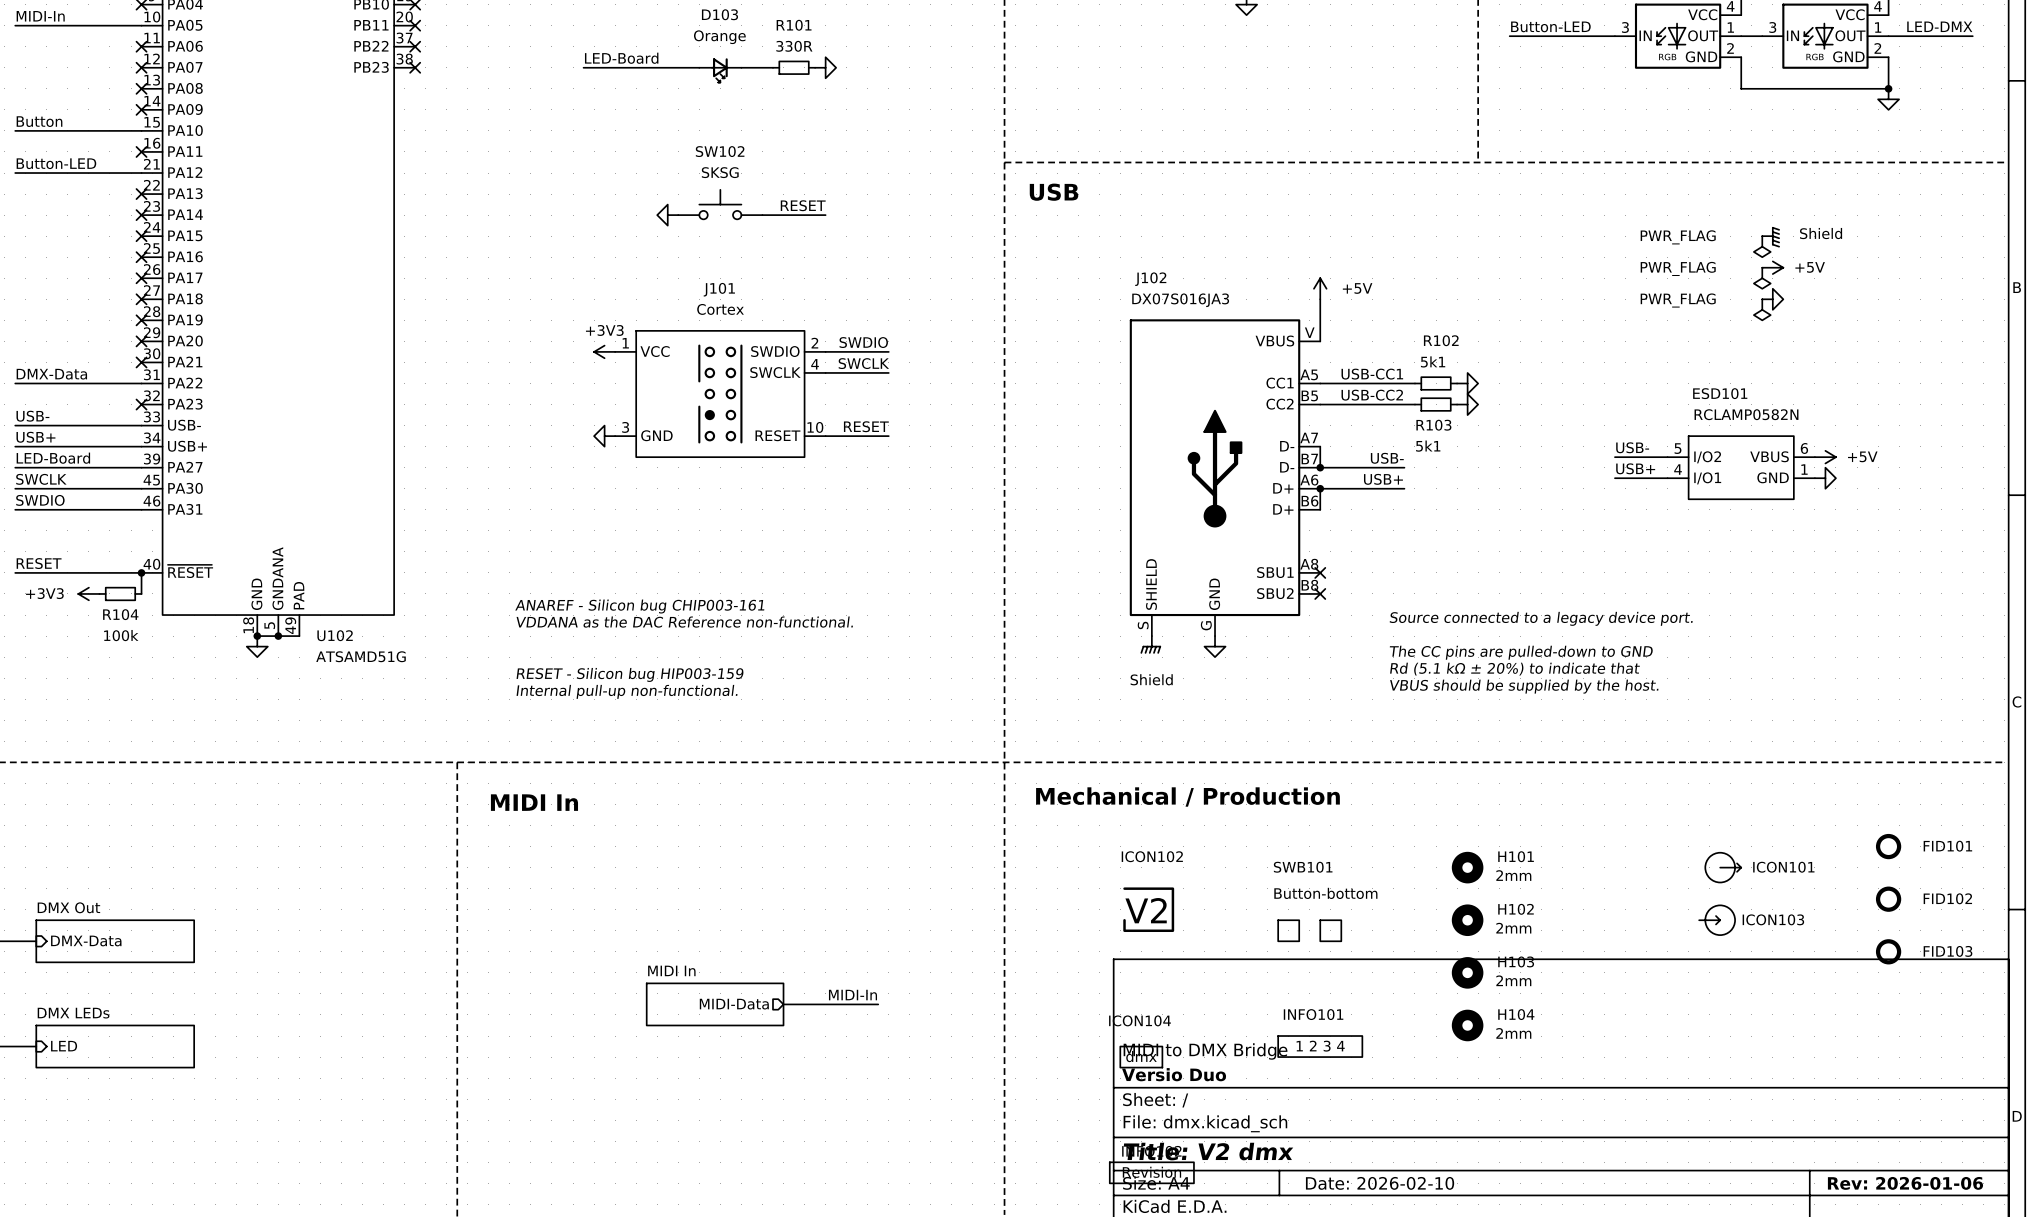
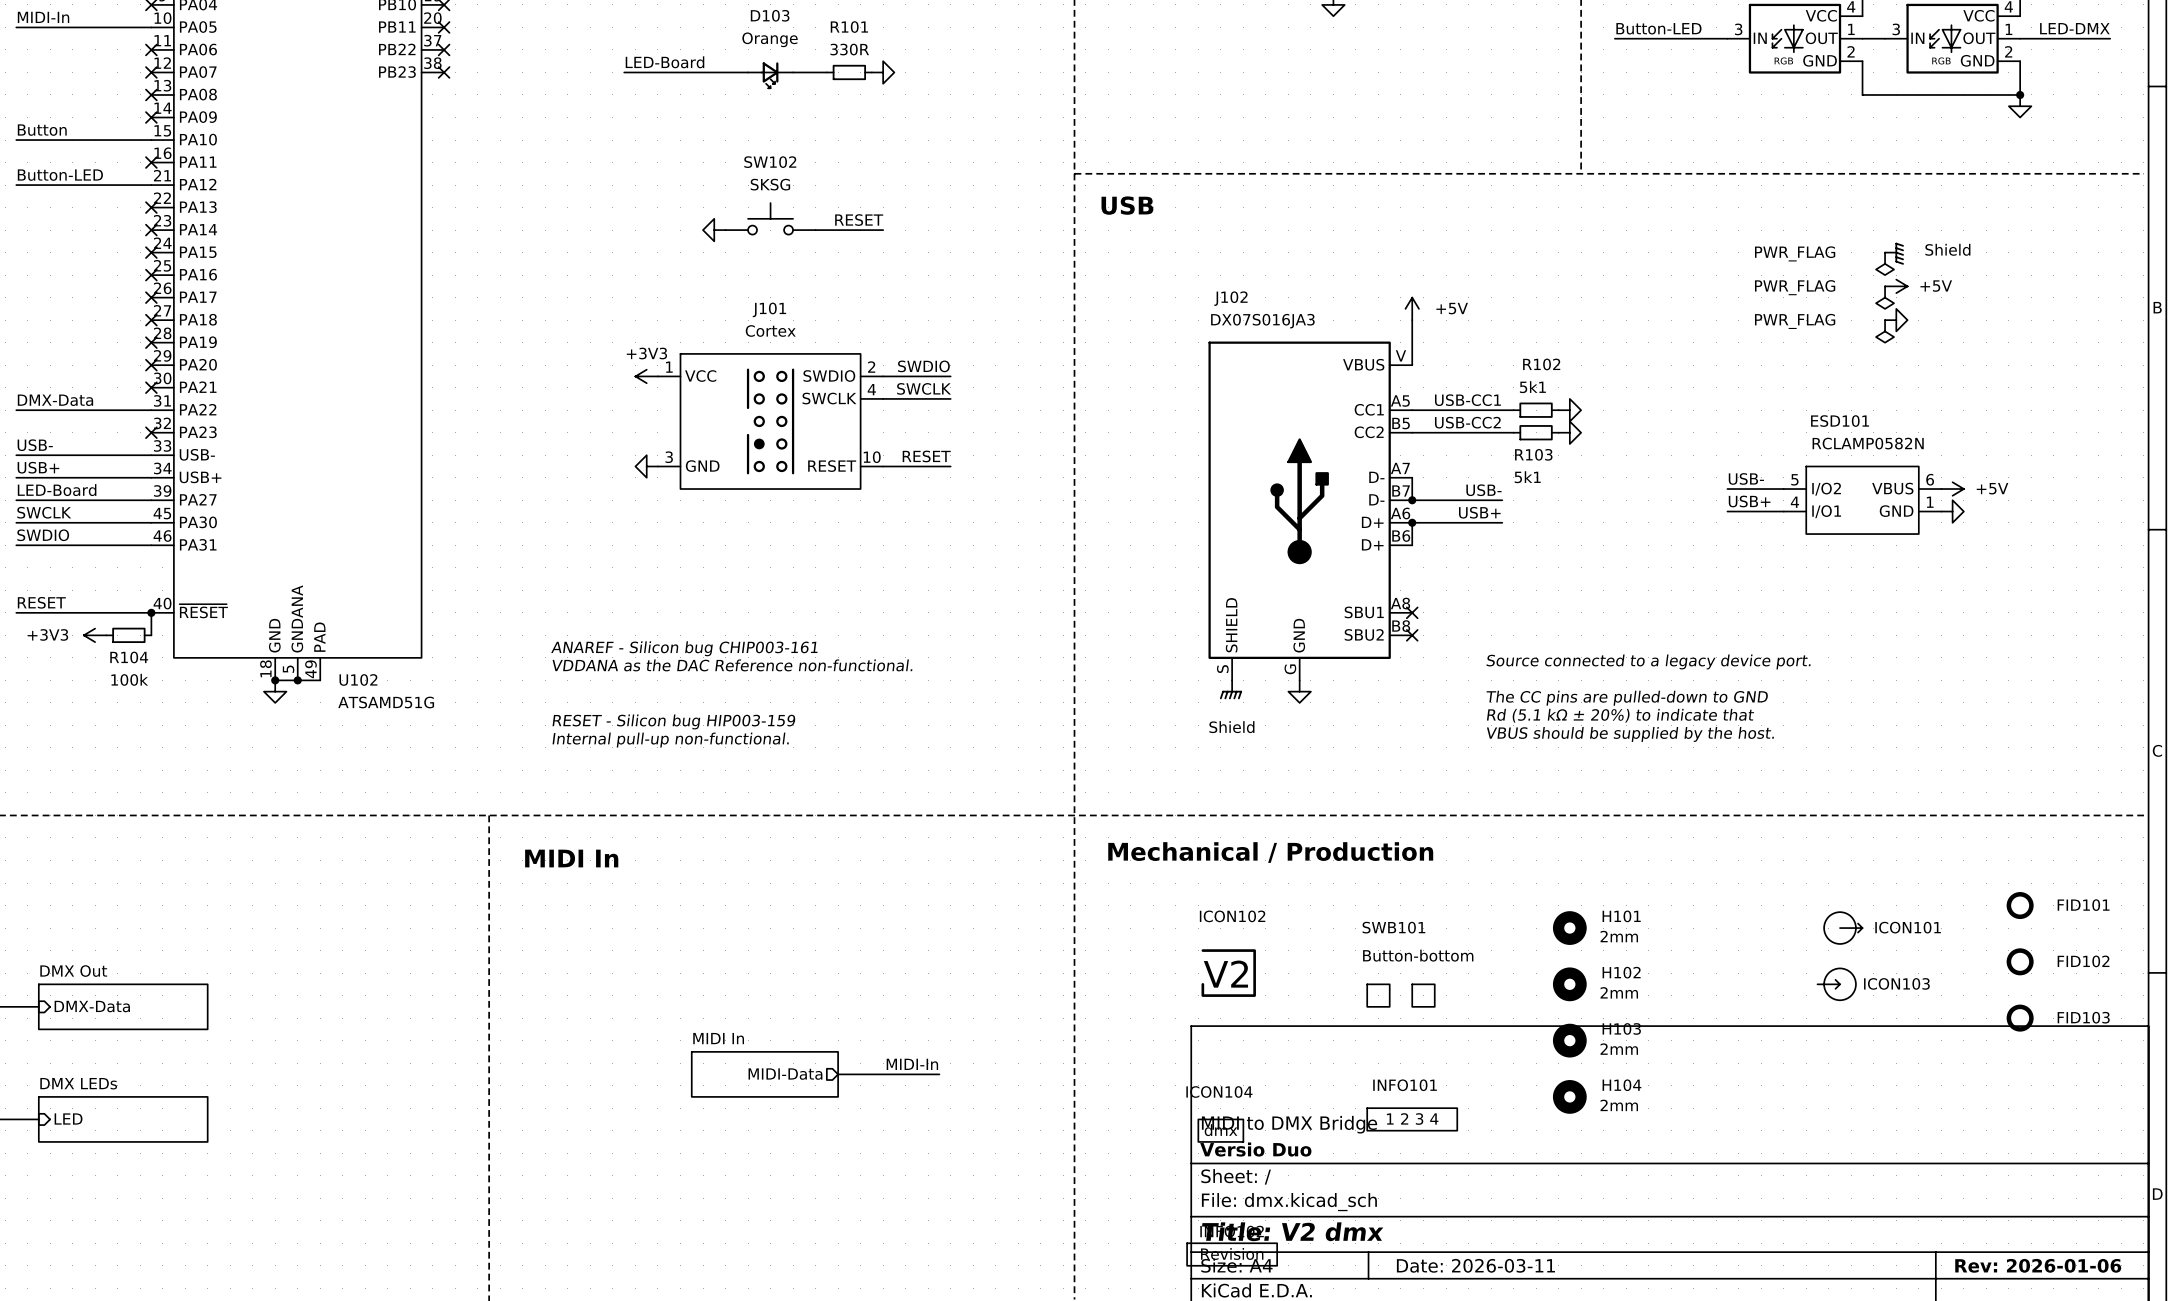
title block: Date: 2026-02-10 (1380, 1183) -> Date: 2026-03-11 (1475, 1265)

